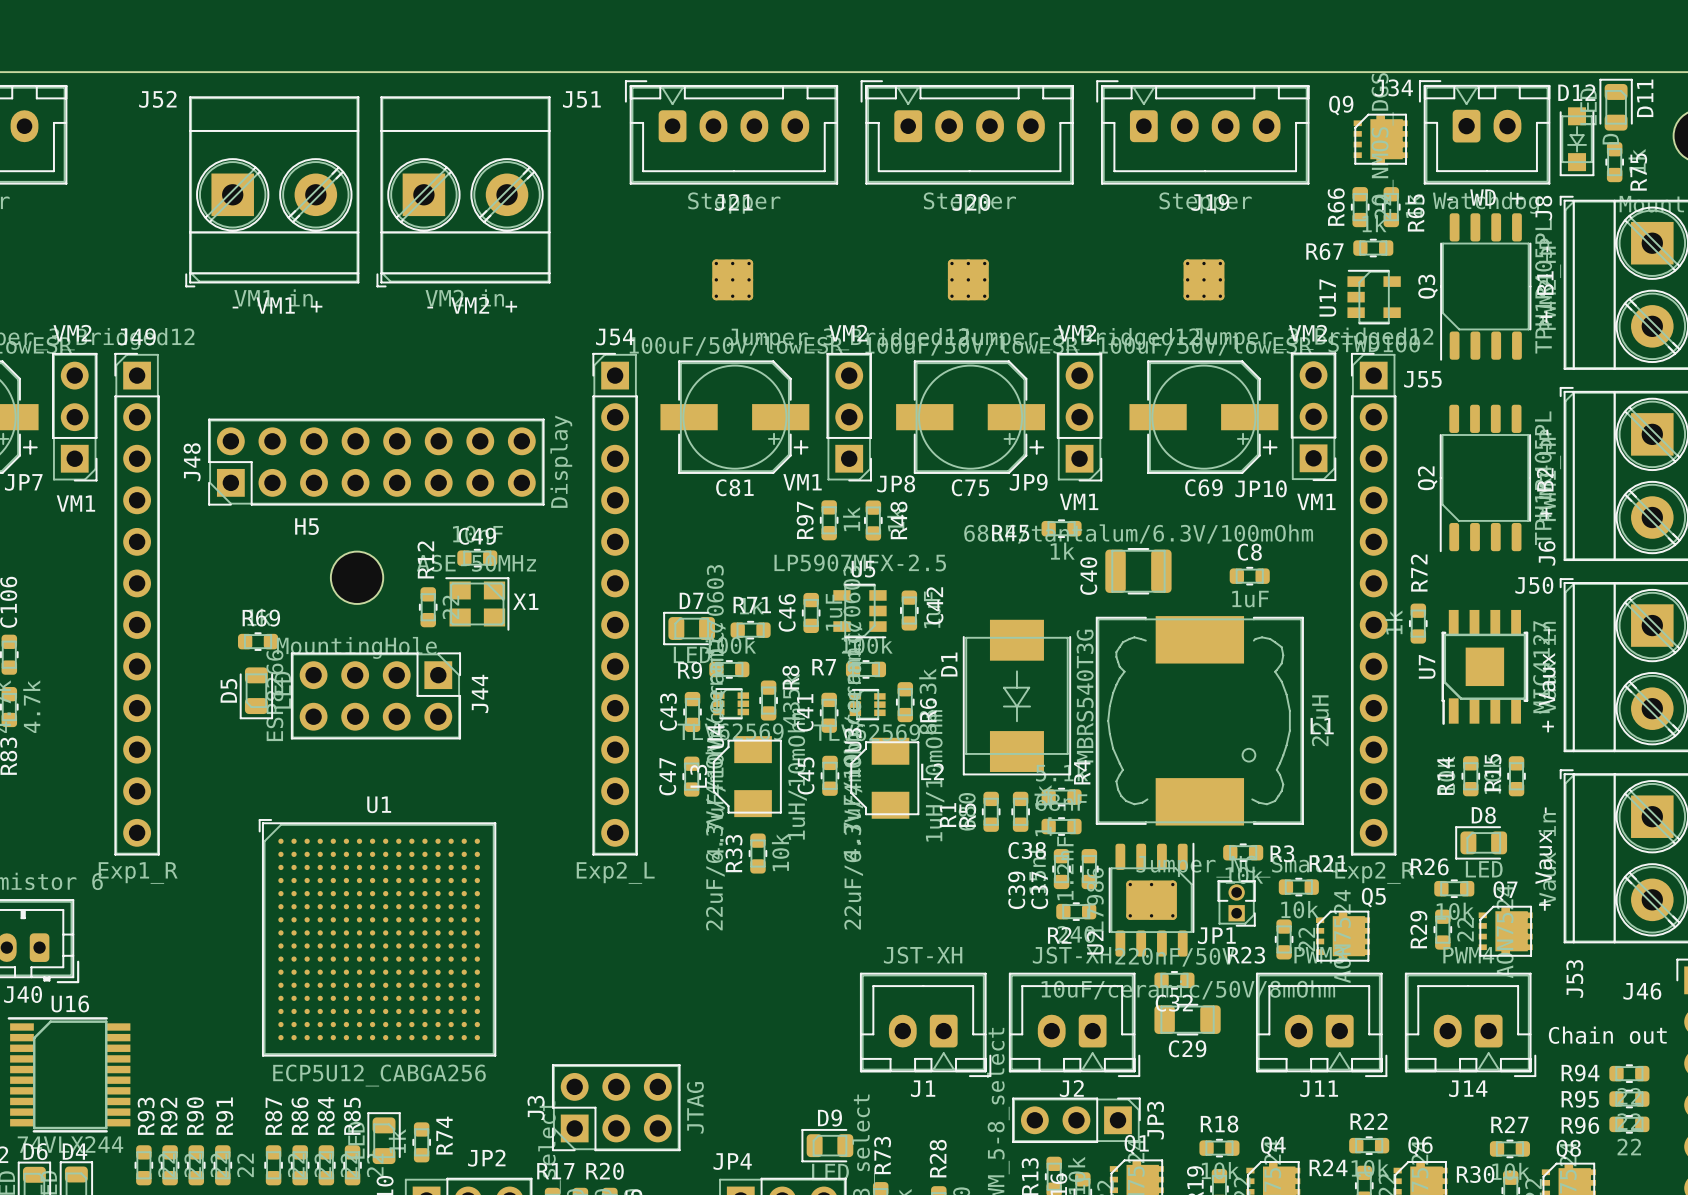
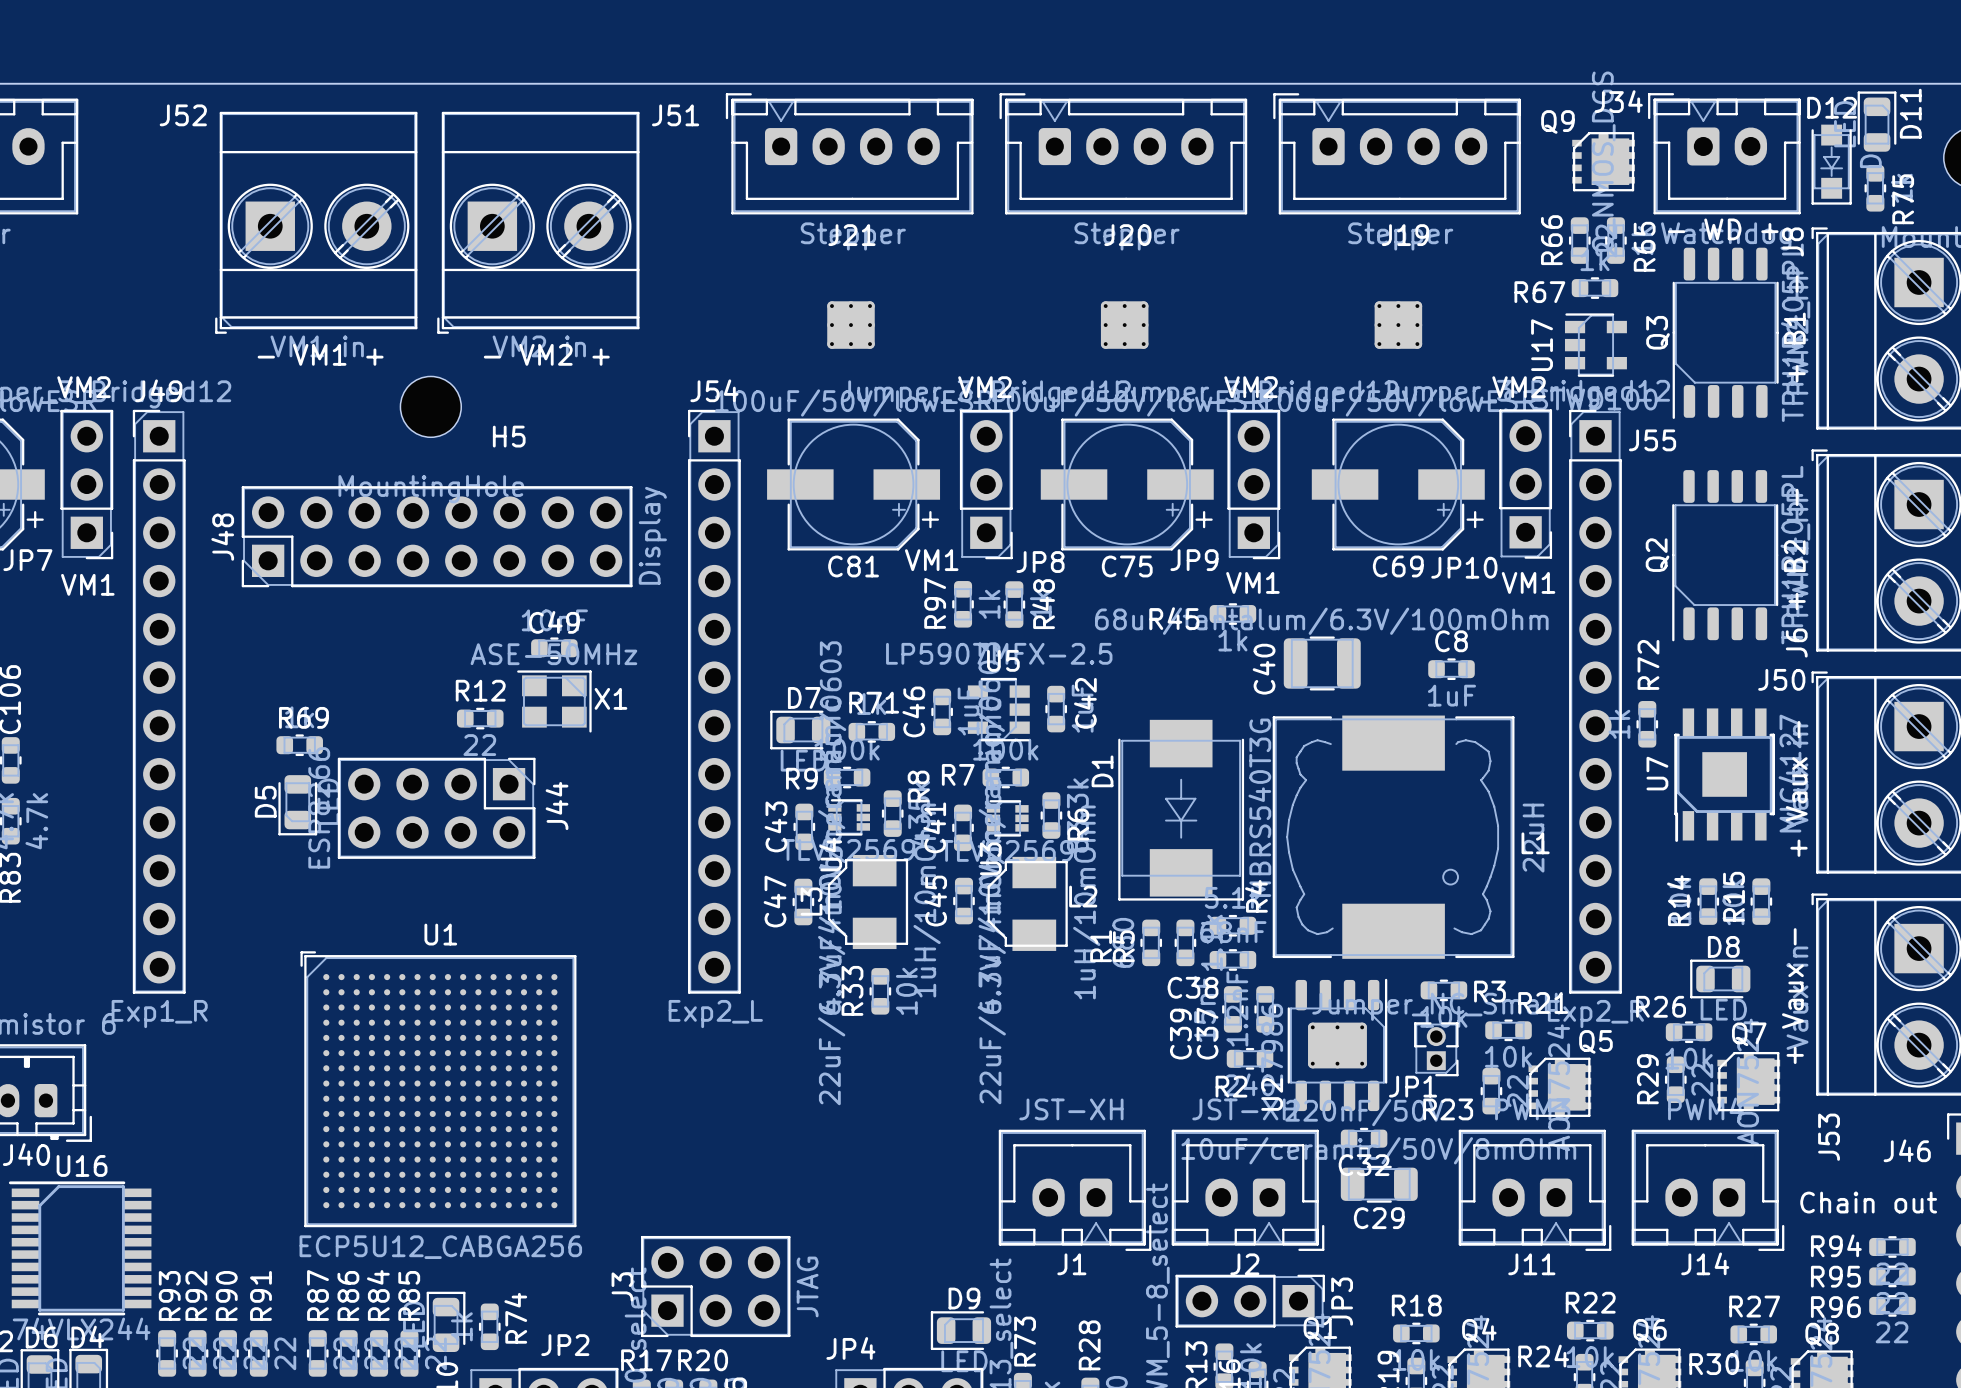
H5 name position: H5 (306, 526) -> H5 (509, 436)
H5 position: (357, 577) -> (430, 406)
R12 rotation: 0° (428, 607) -> 90° clockwise (480, 718)

